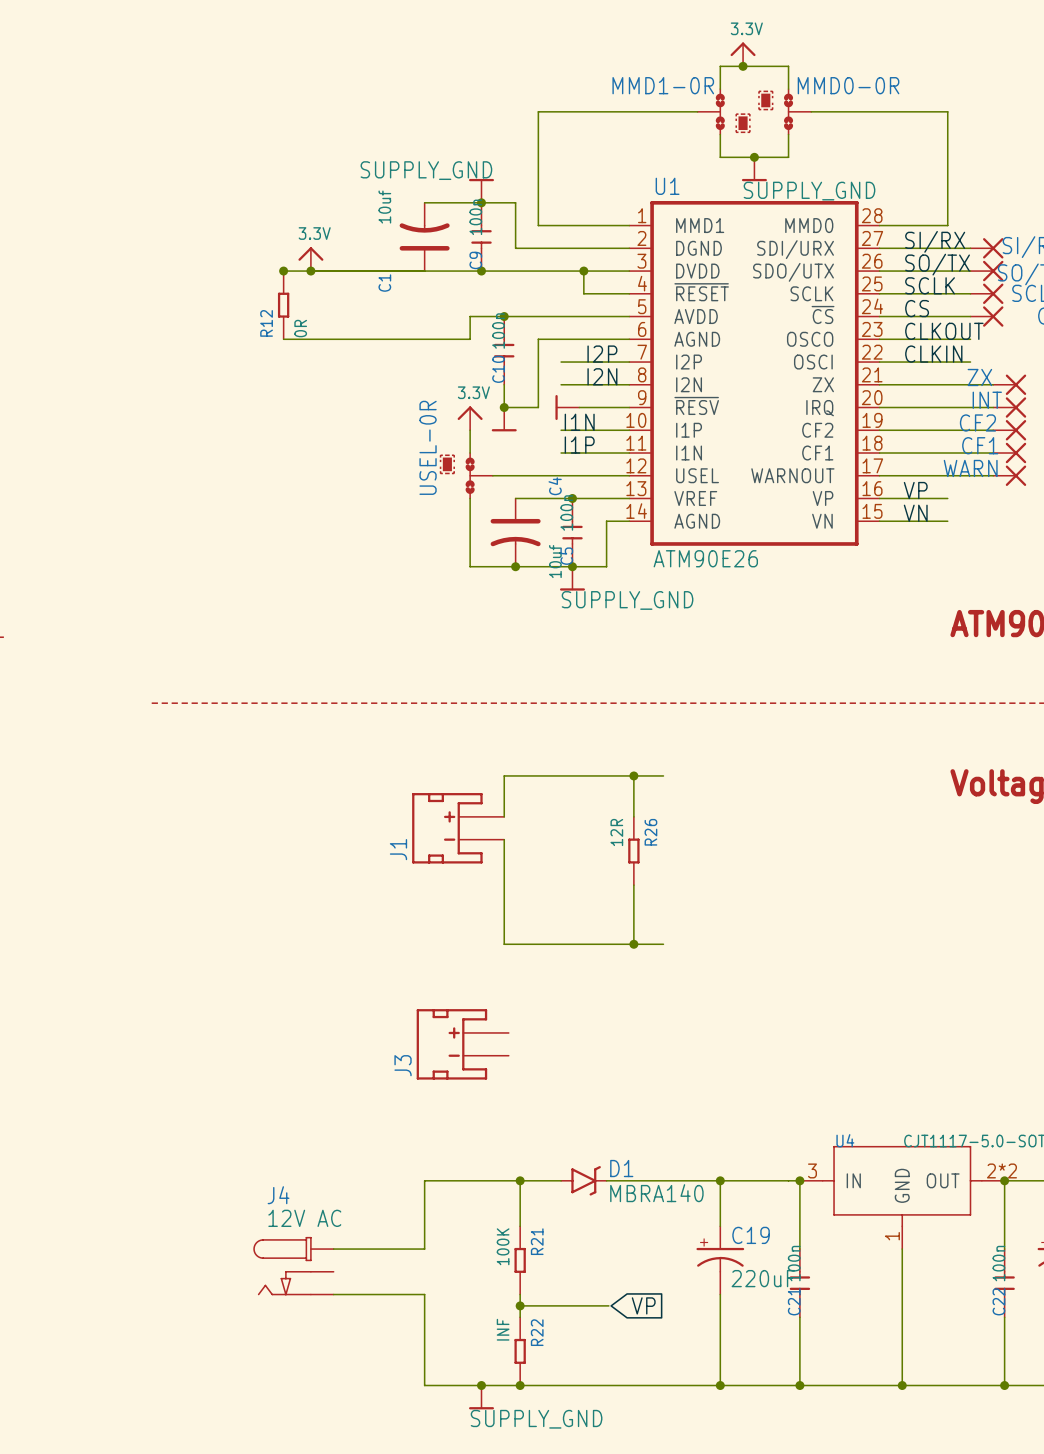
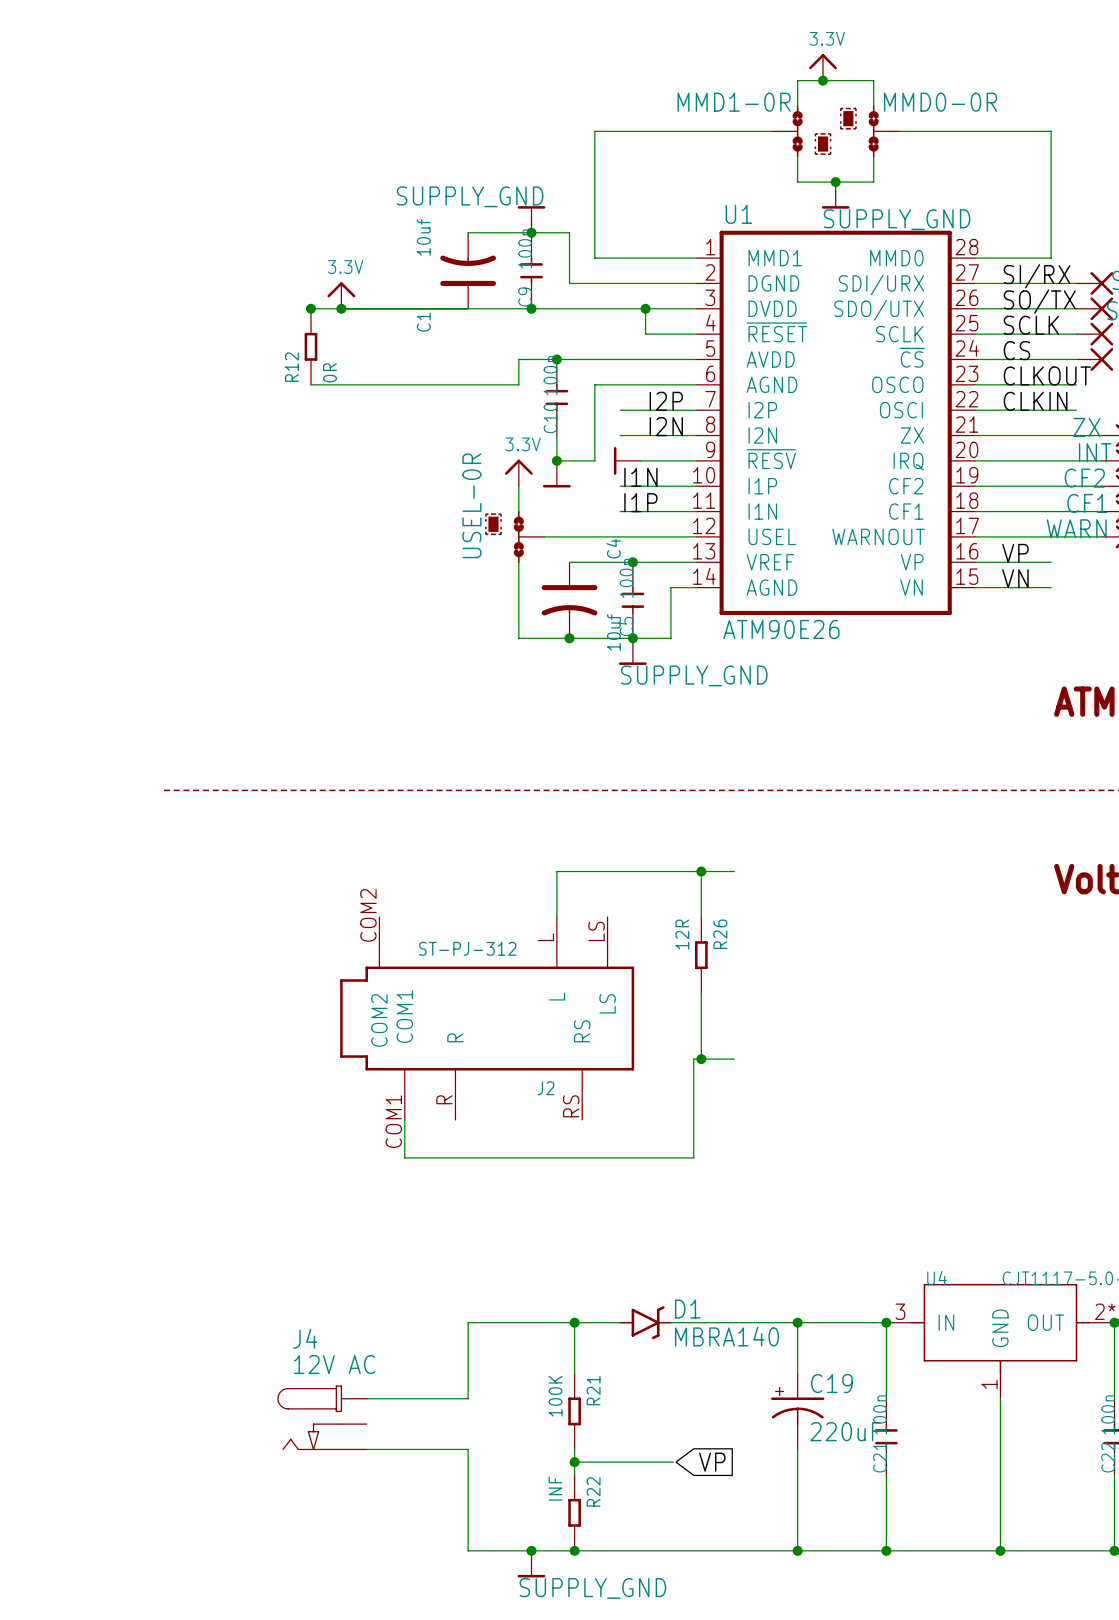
J1: (458, 828) -> none
wire: (504, 839) (504, 944) (627, 944) -> (404, 1119) (404, 1157) (693, 1157) (693, 1059)
J2: none -> ST-PJ-312 (487, 1018)
J3: (462, 1044) -> none

